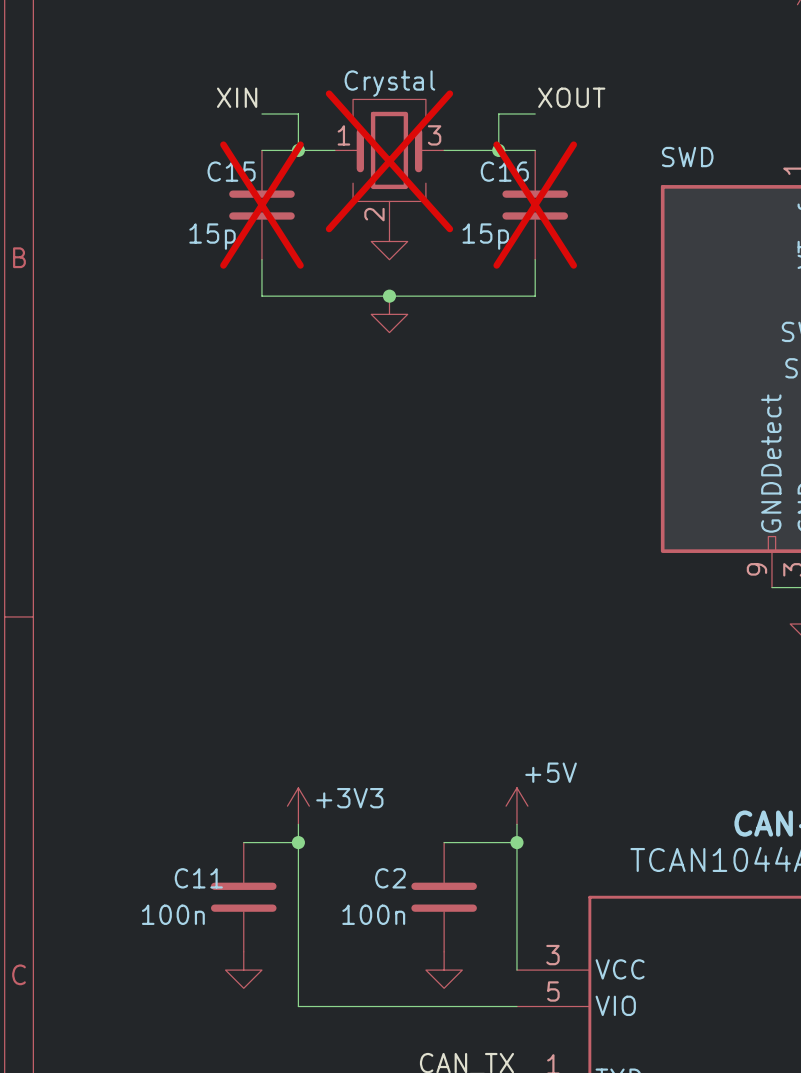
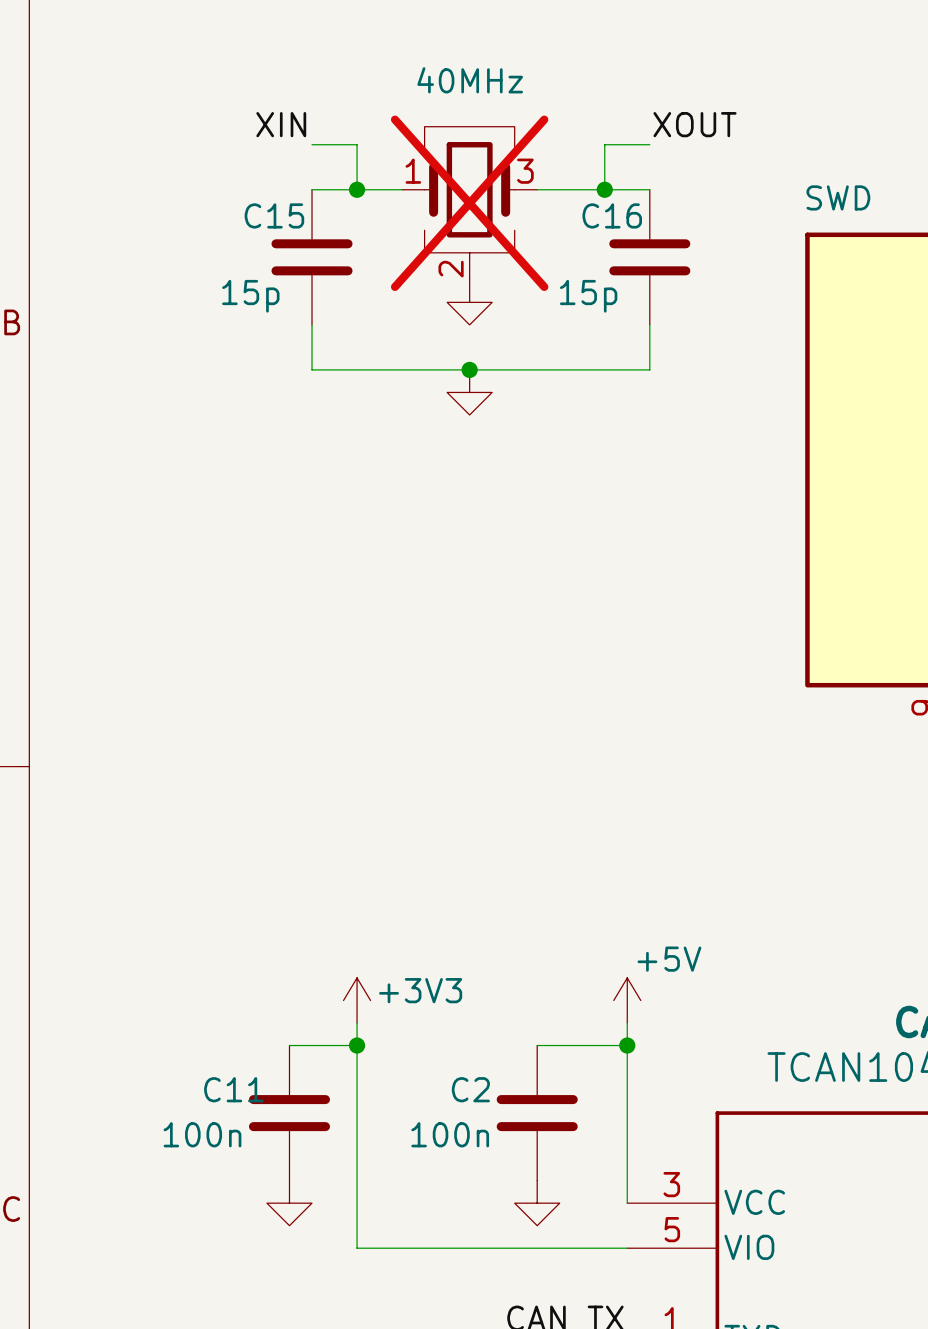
part value: Crystal (389, 83) -> 40MHz (470, 80)
C15 do-not-place cross: (261, 205) -> none
C16 do-not-place cross: (535, 205) -> none

